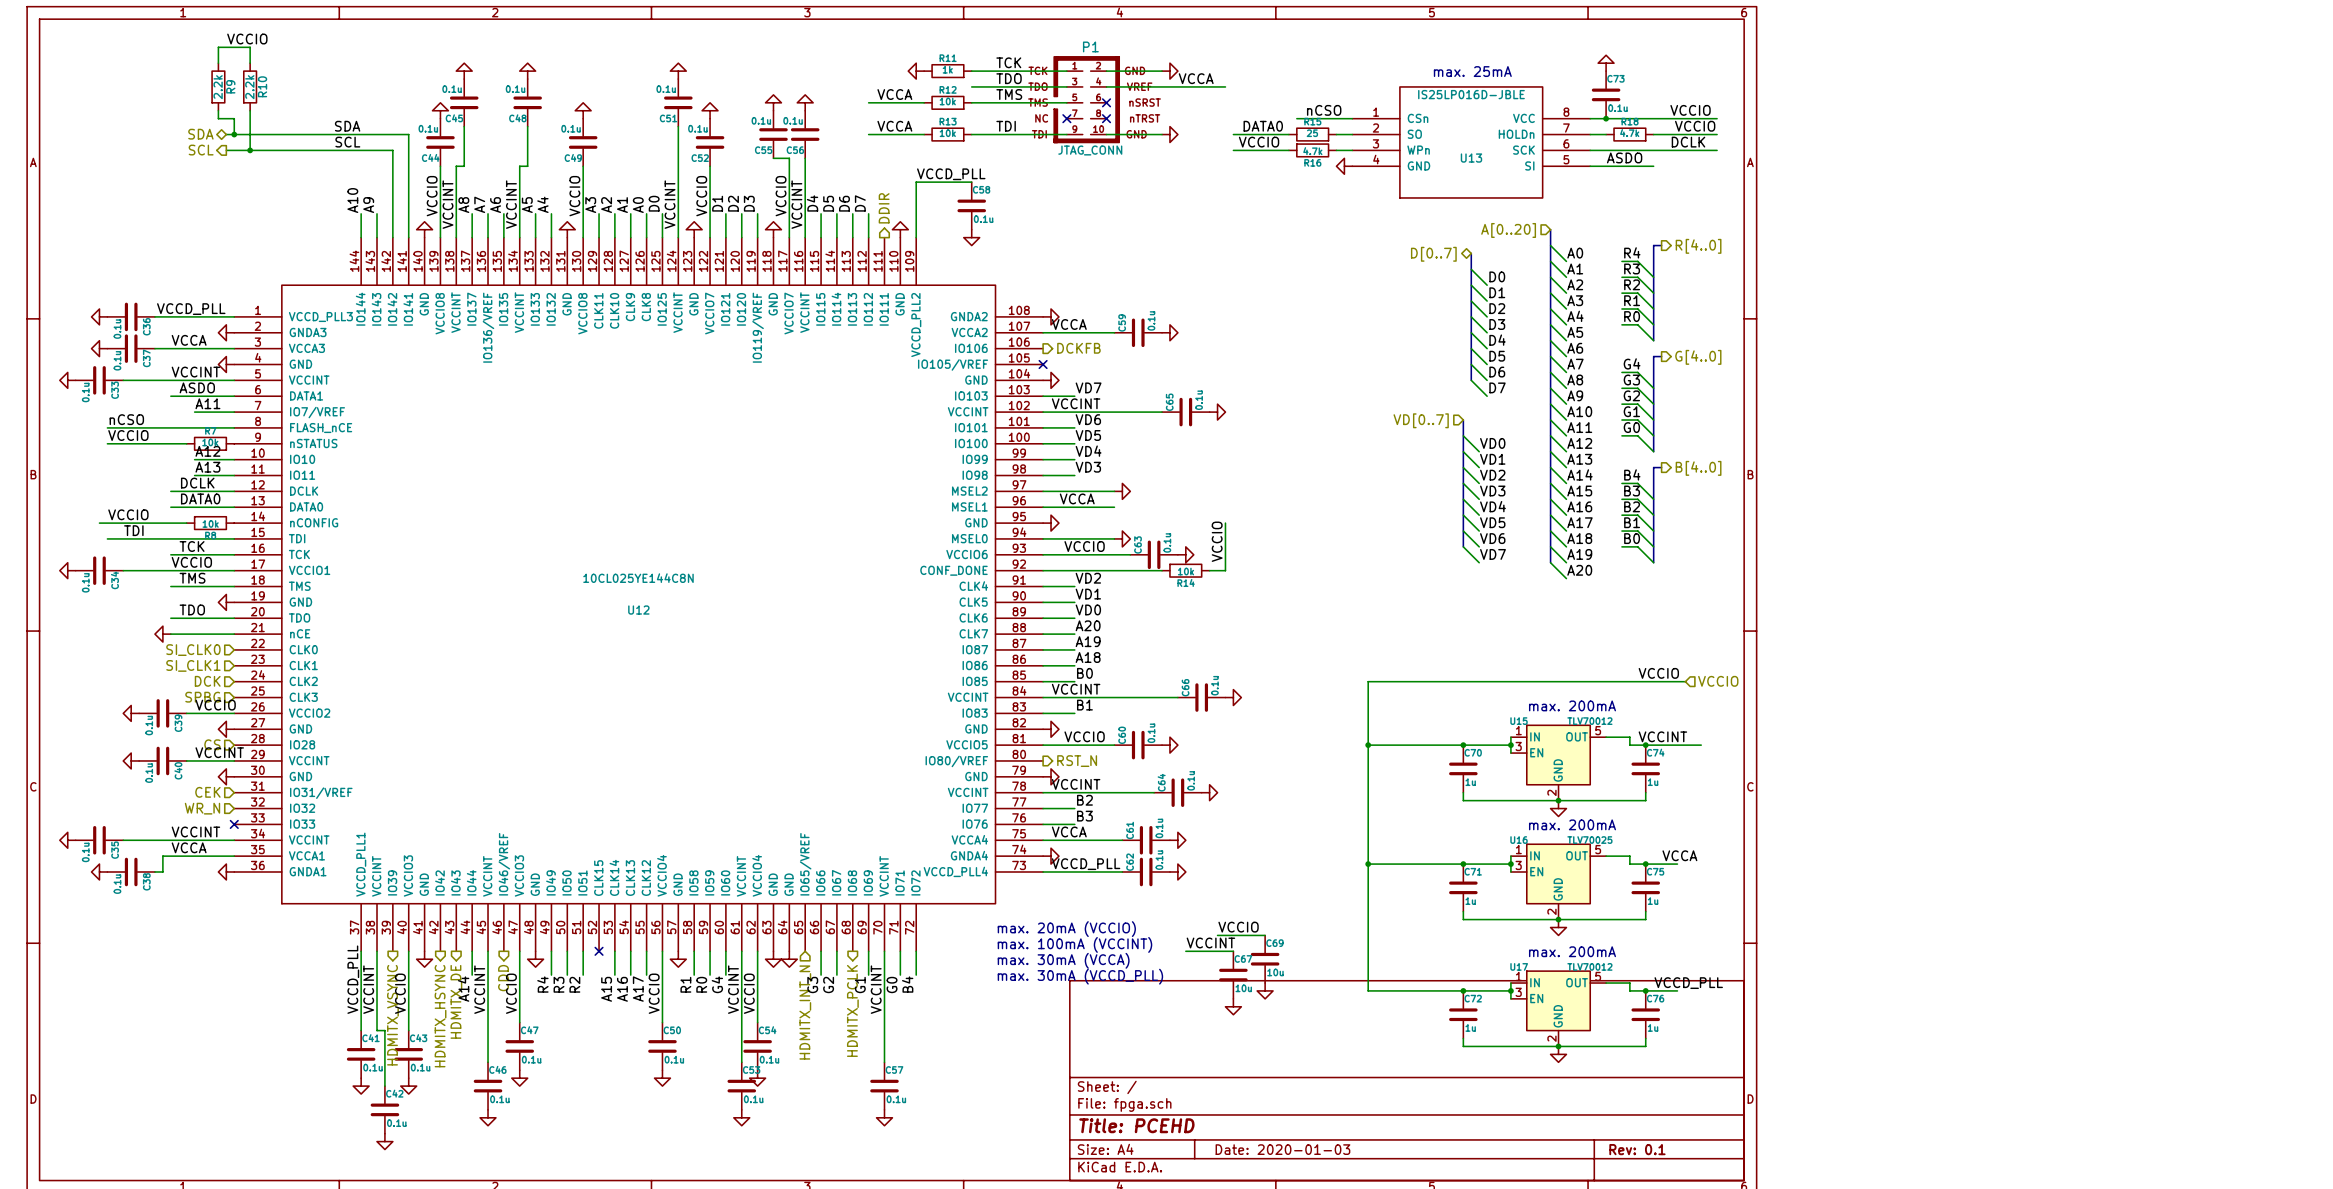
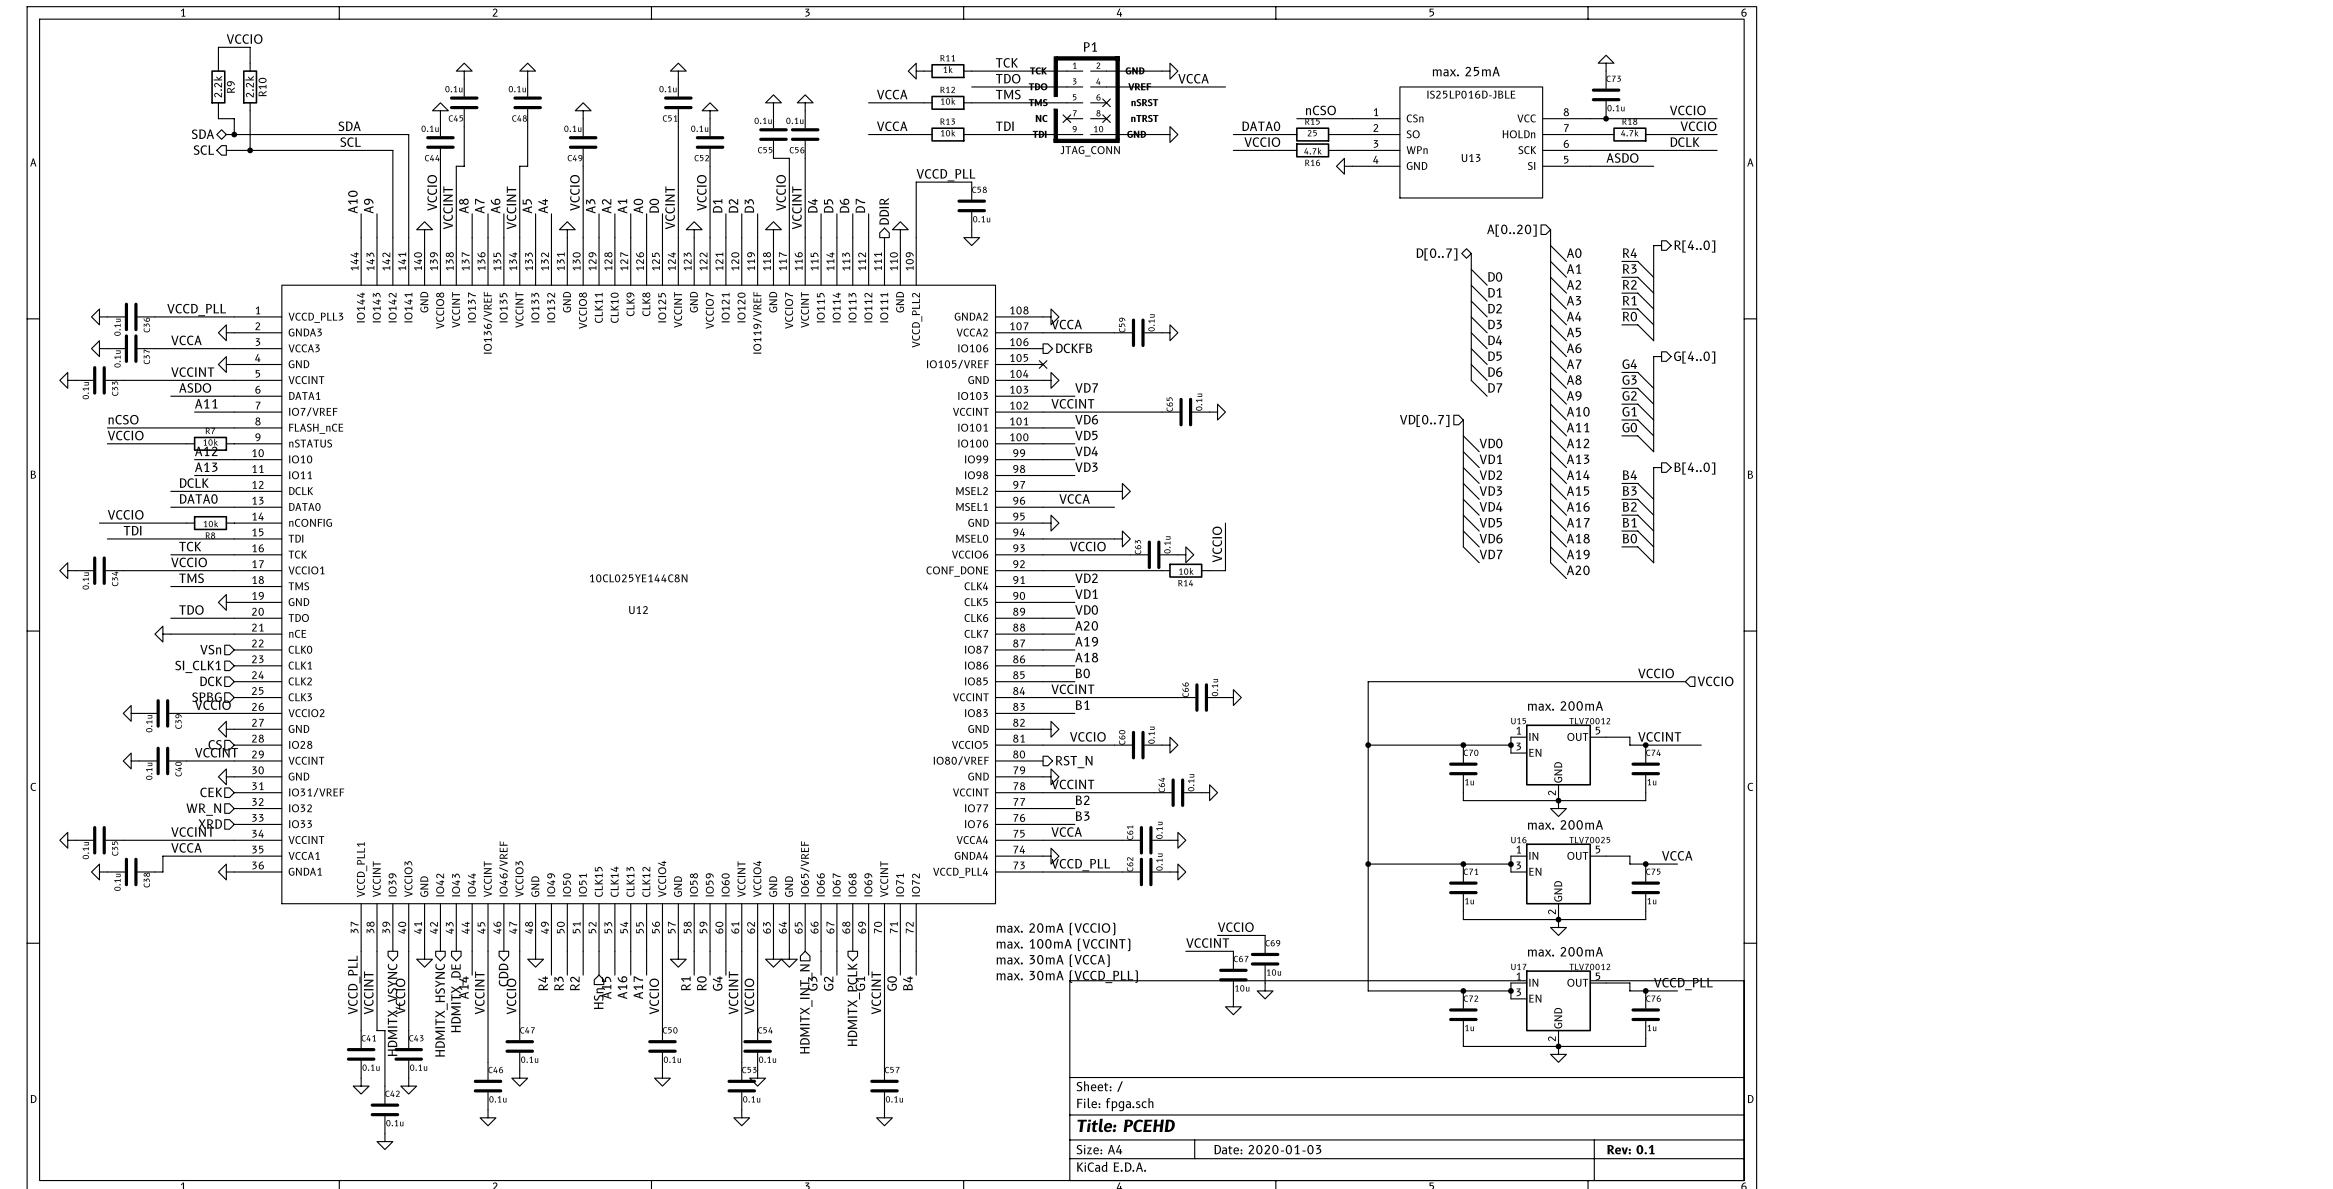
hierarchical label: SI_CLK0 (193, 650) -> VSn (210, 649)
hierarchical label: none -> XRD (210, 824)
no-connect mark: (234, 824) -> none
wire: none -> (599, 951) (599, 975)
no-connect mark: (599, 951) -> none
hierarchical label: none -> HSn (598, 998)

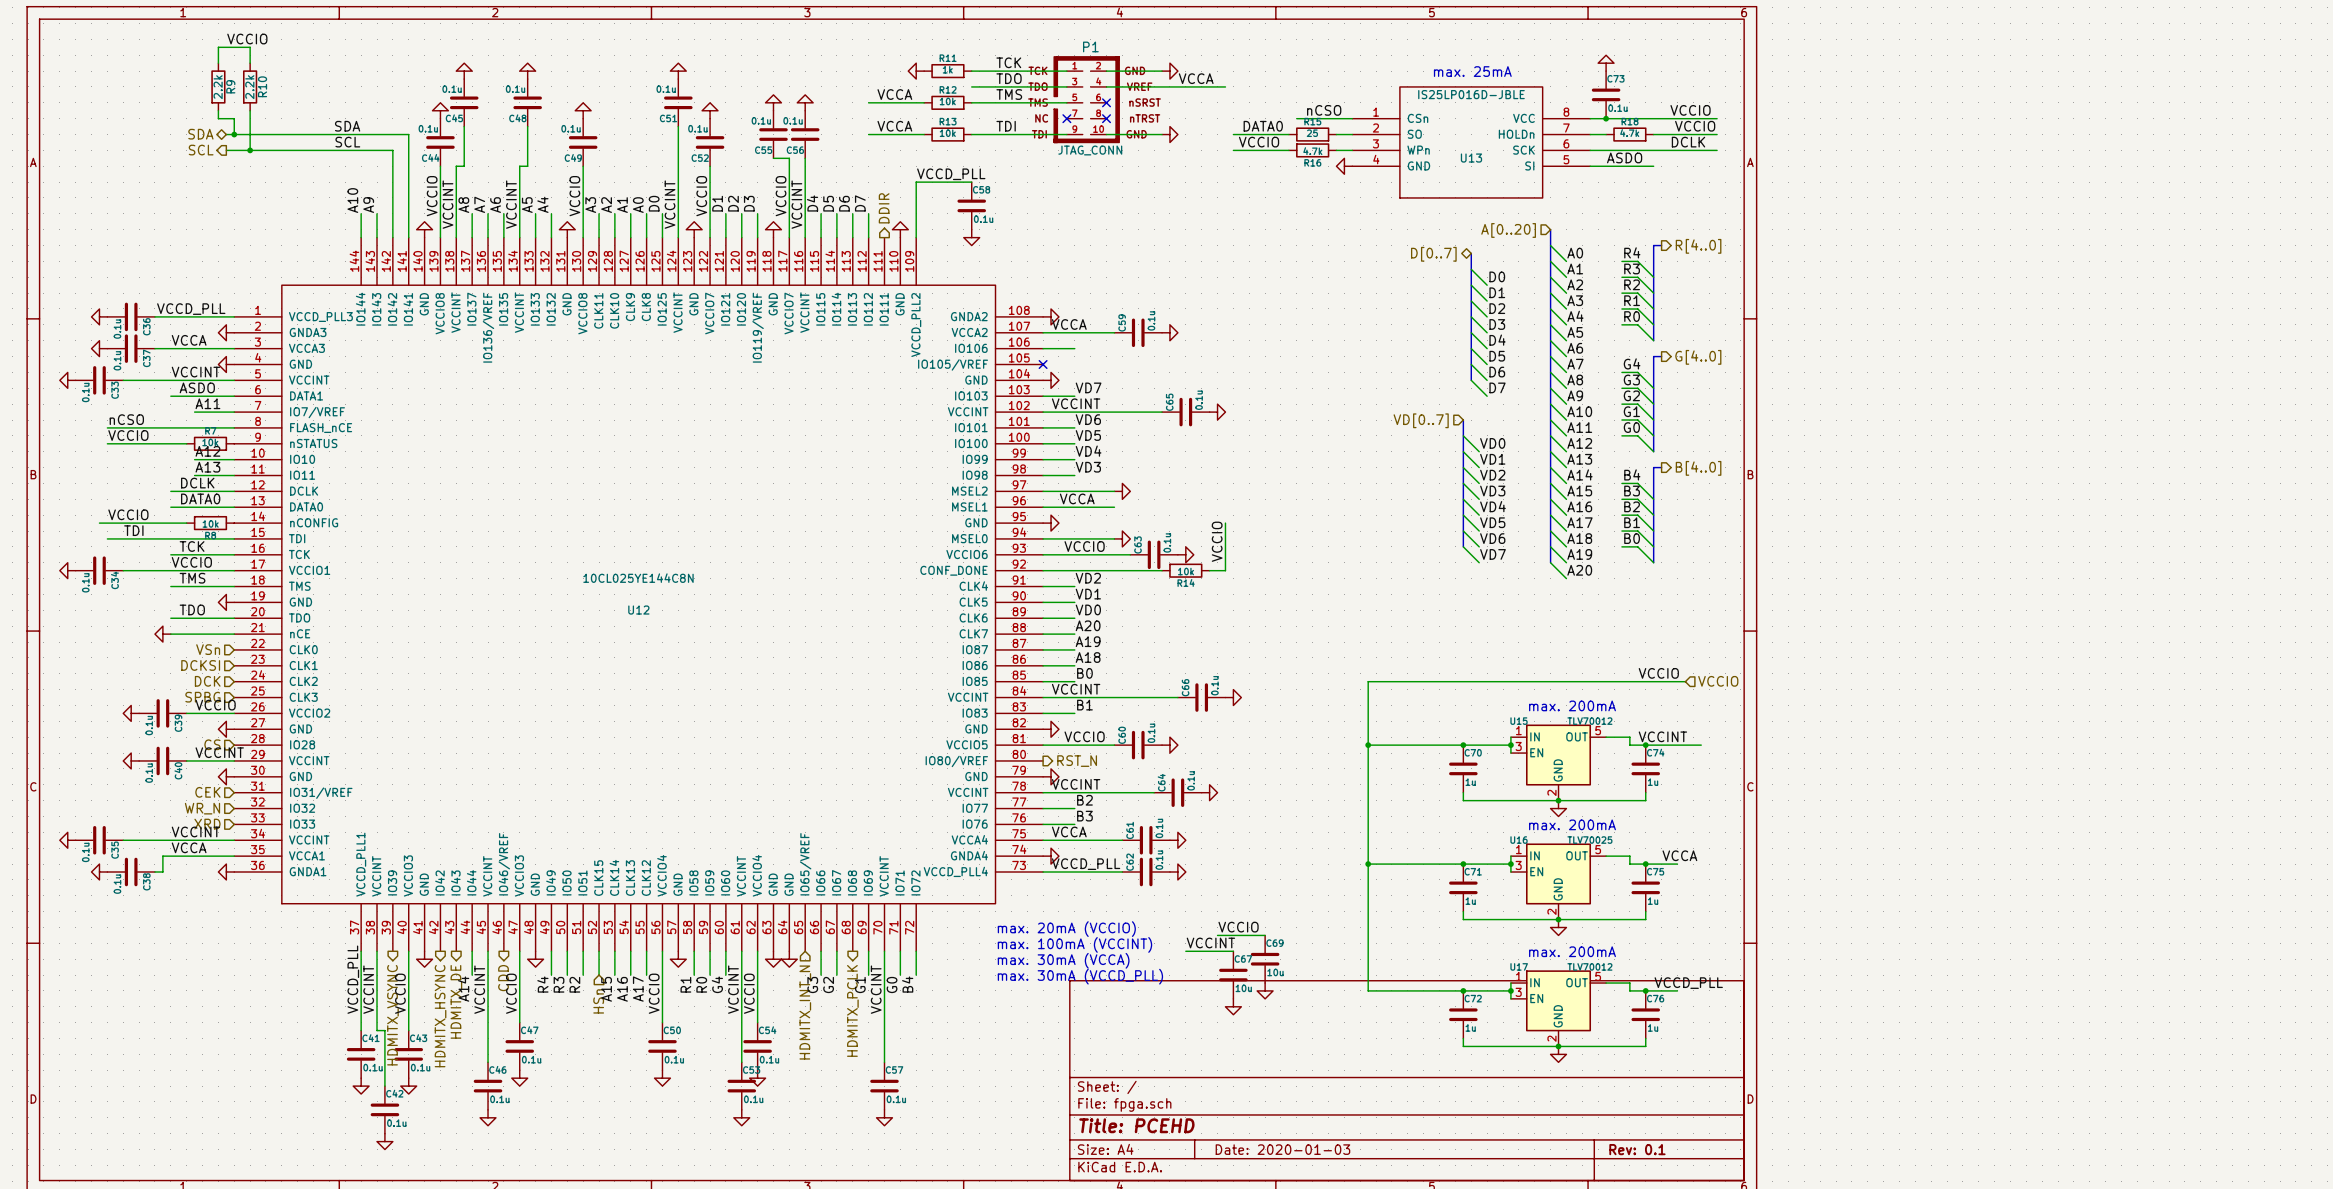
wire: none -> (1043, 348) (1074, 348)
hierarchical label: DCKFB (1074, 348) -> none
hierarchical label: SI_CLK1 (198, 666) -> DCKSI (200, 665)

